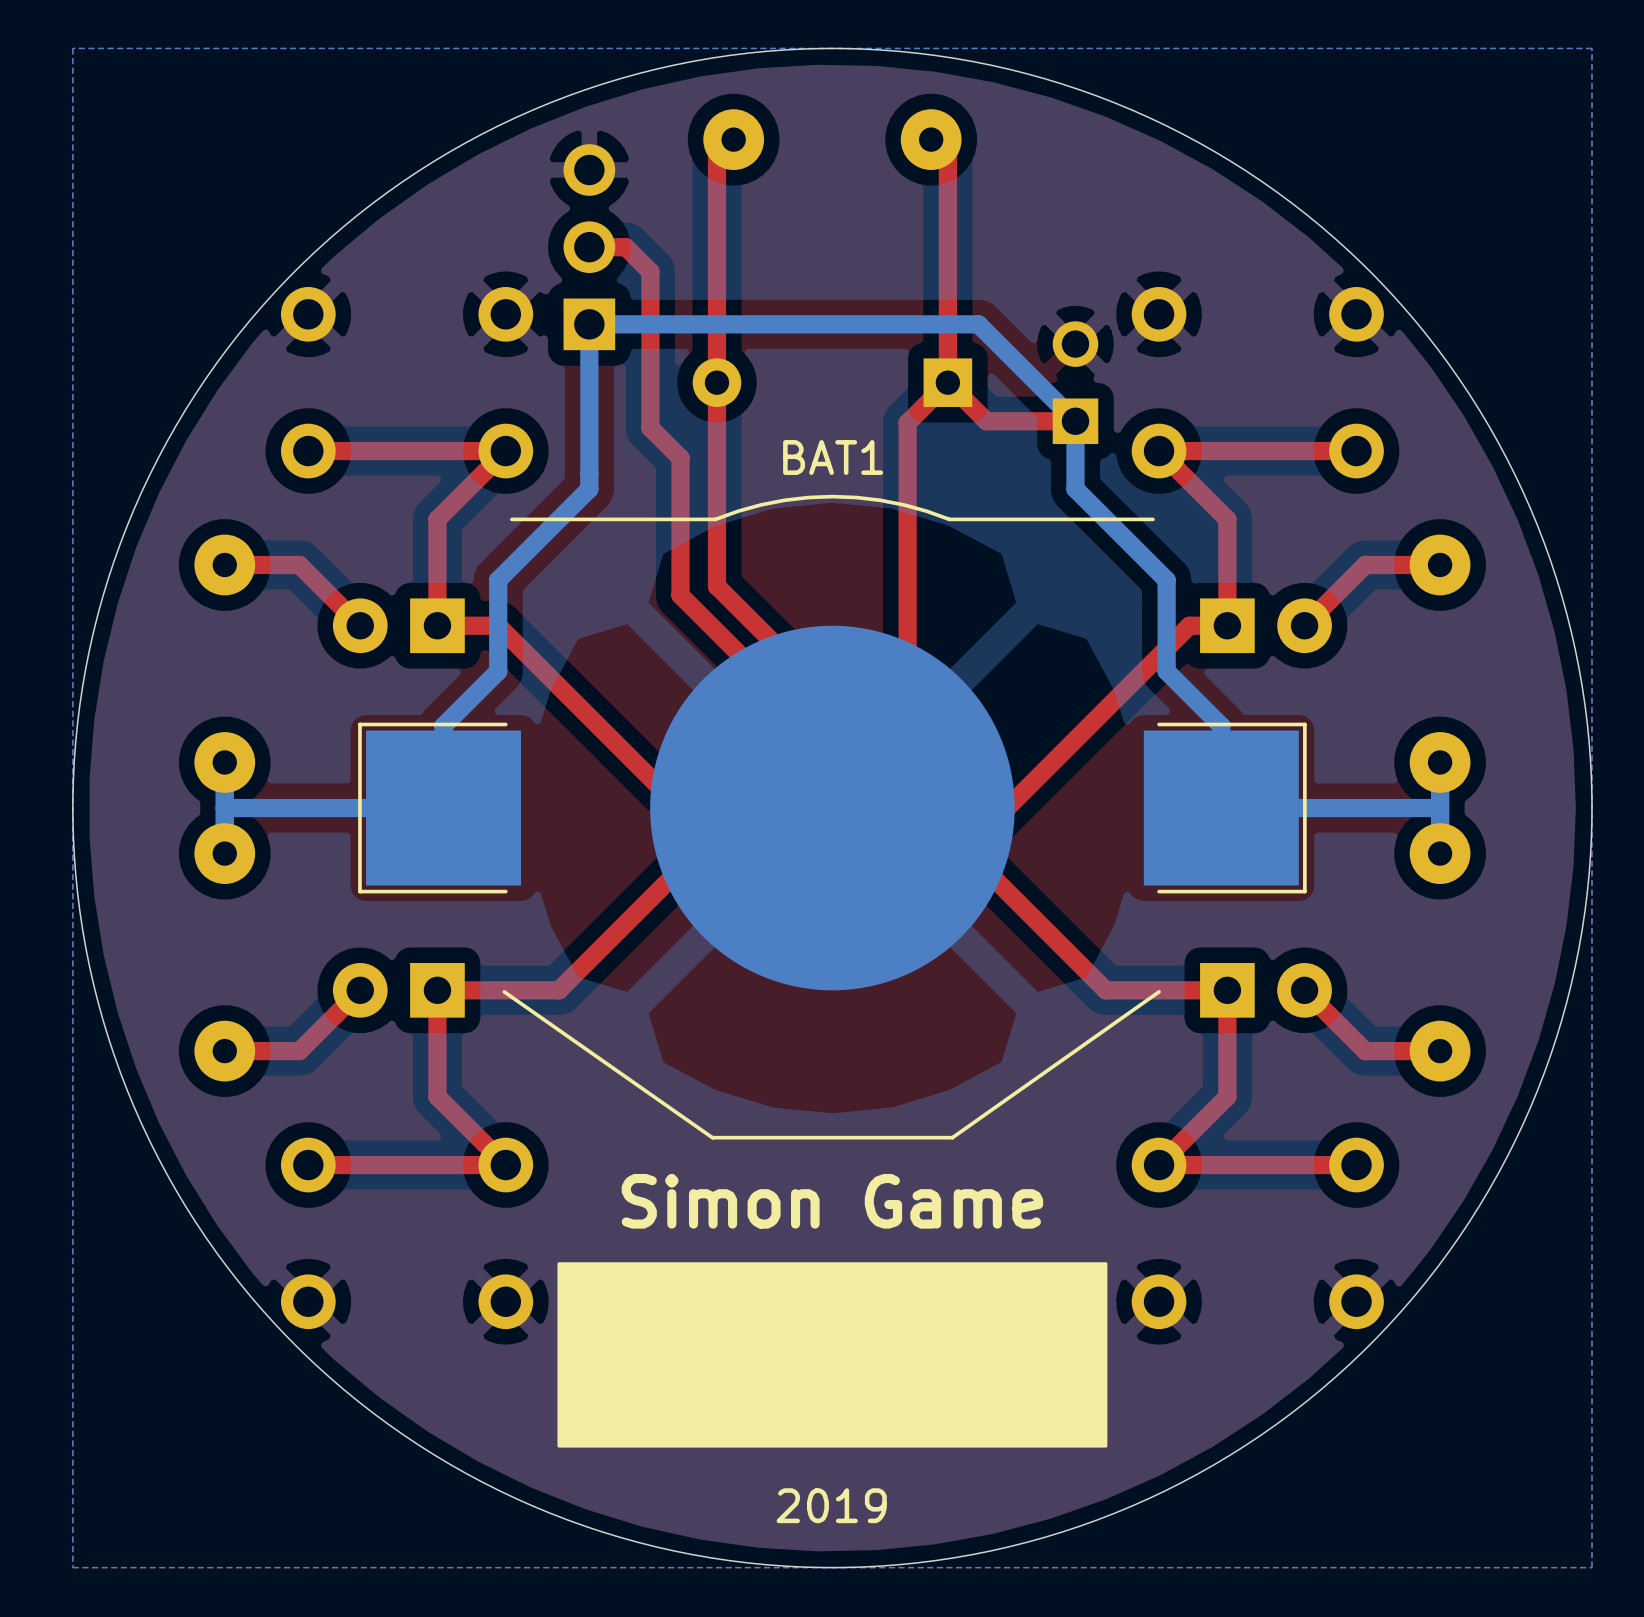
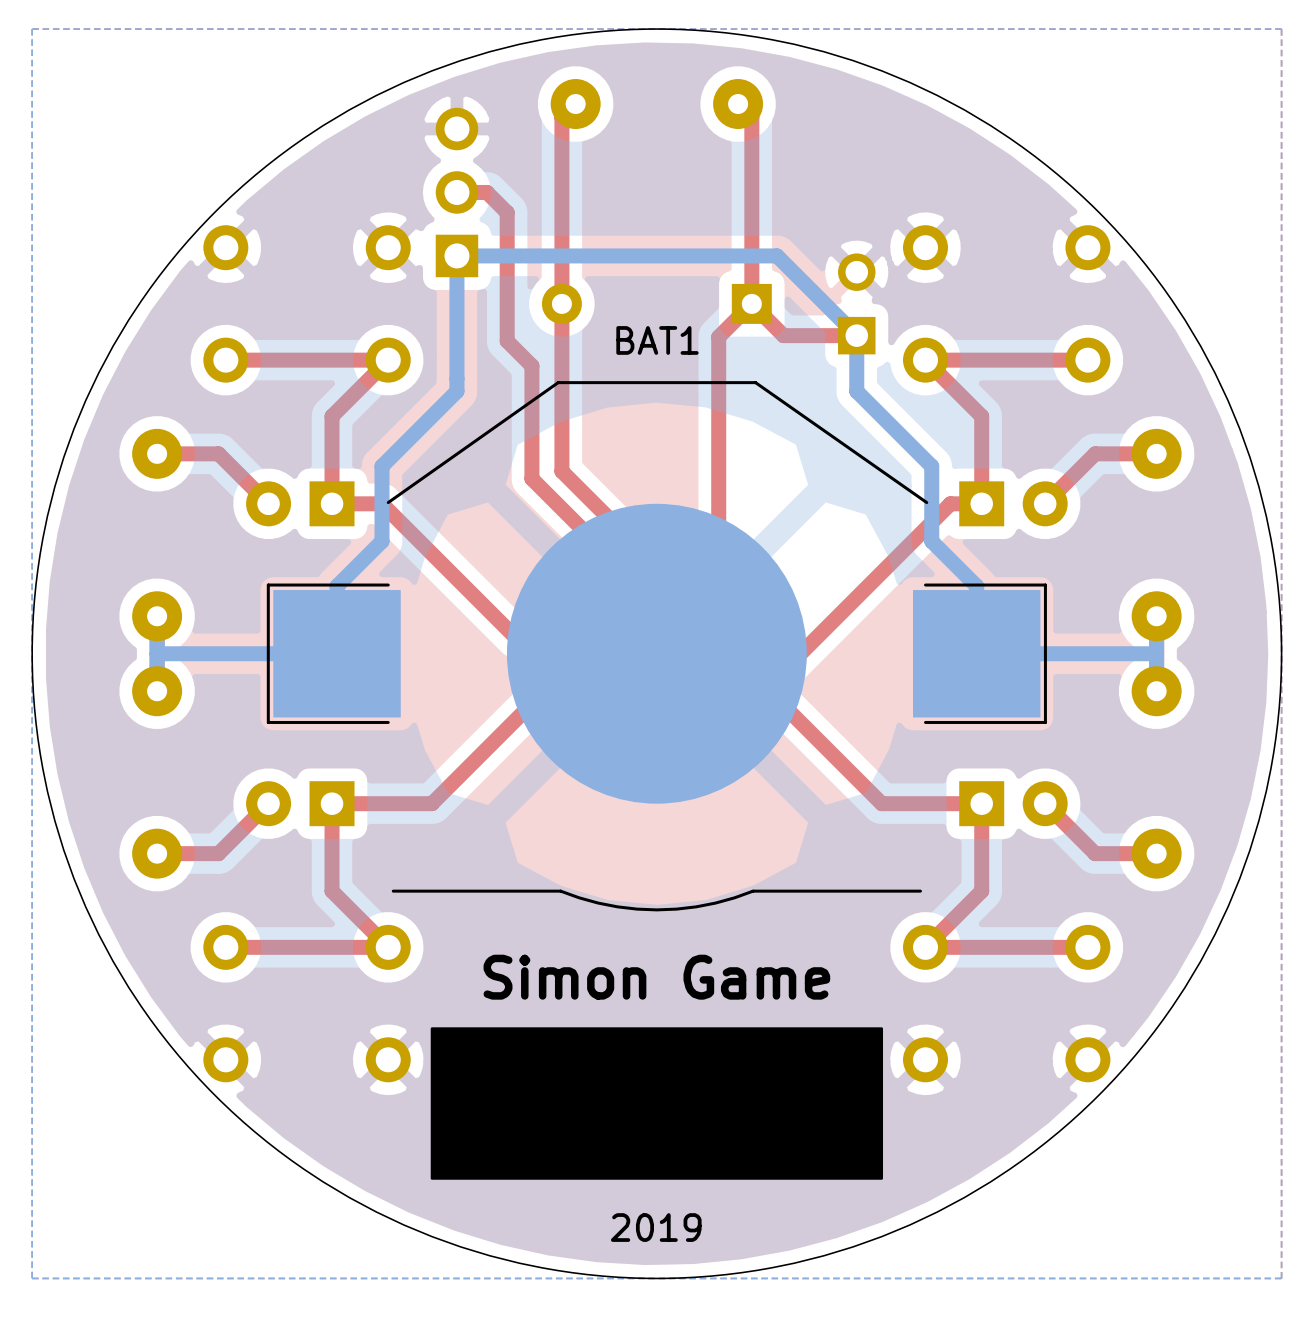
BAT1 rotation: 0° (832, 817) -> 180° (656, 646)

